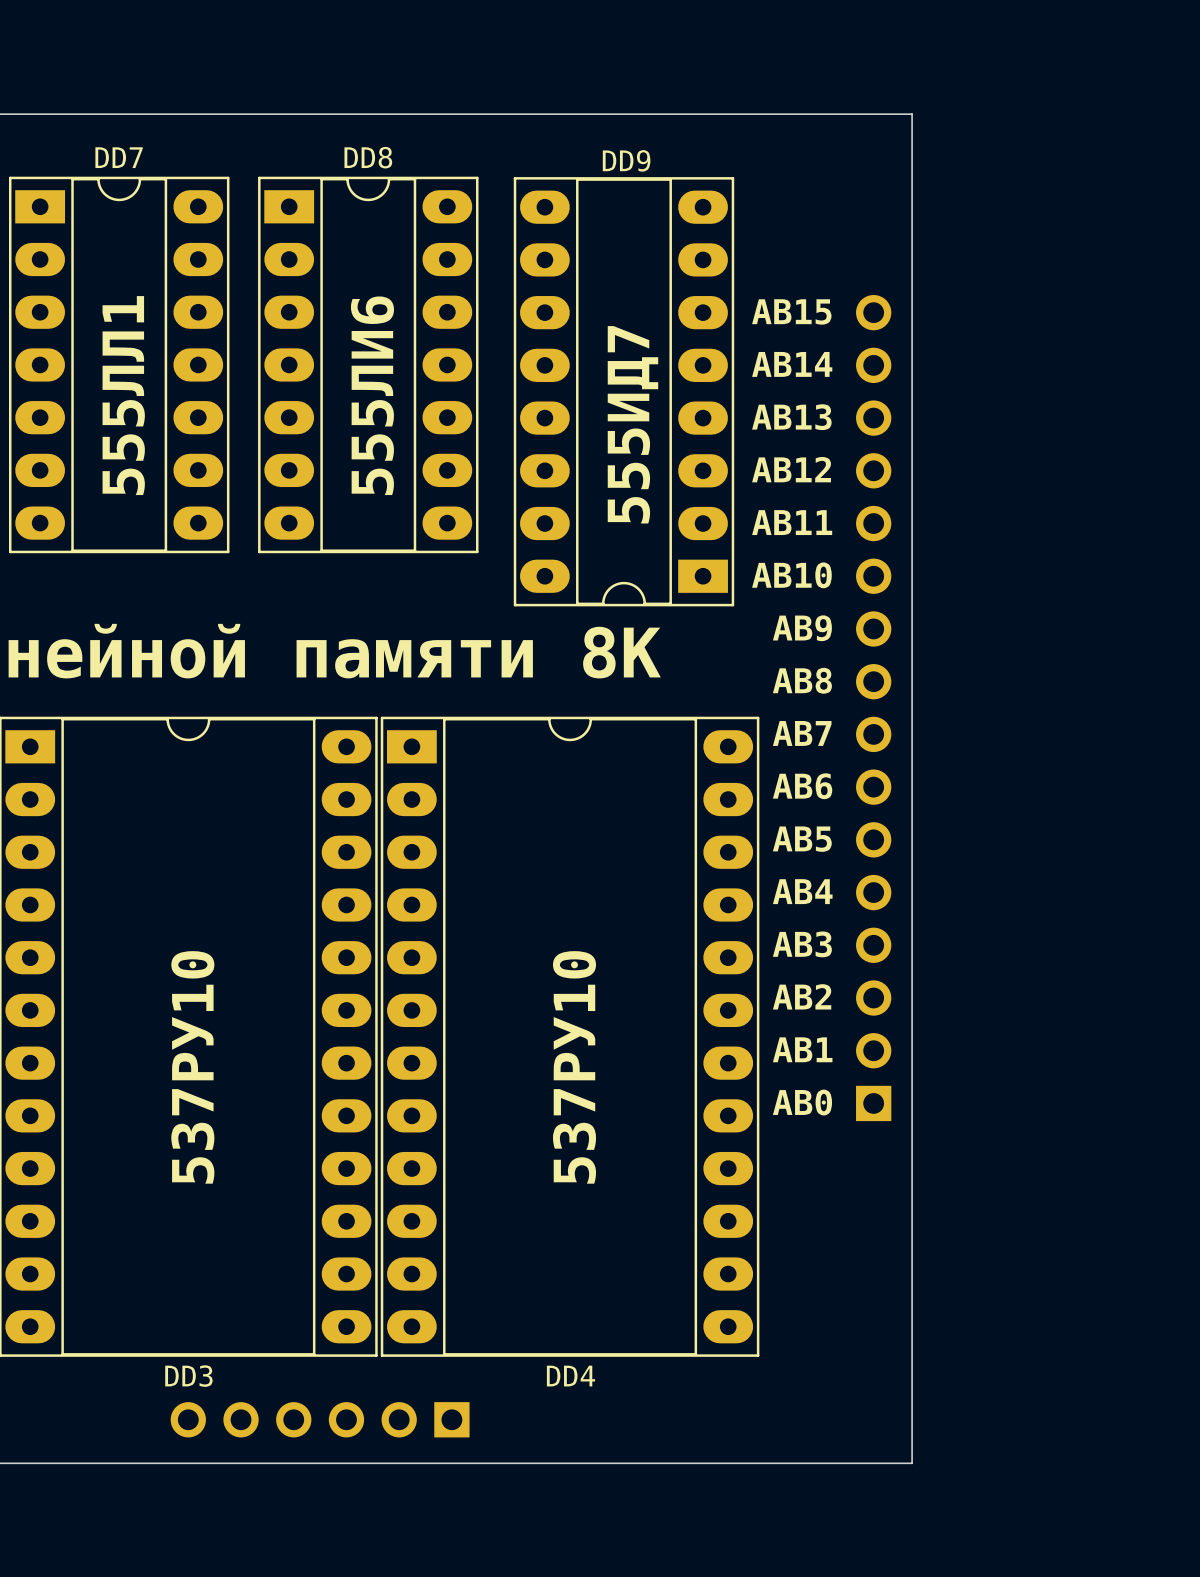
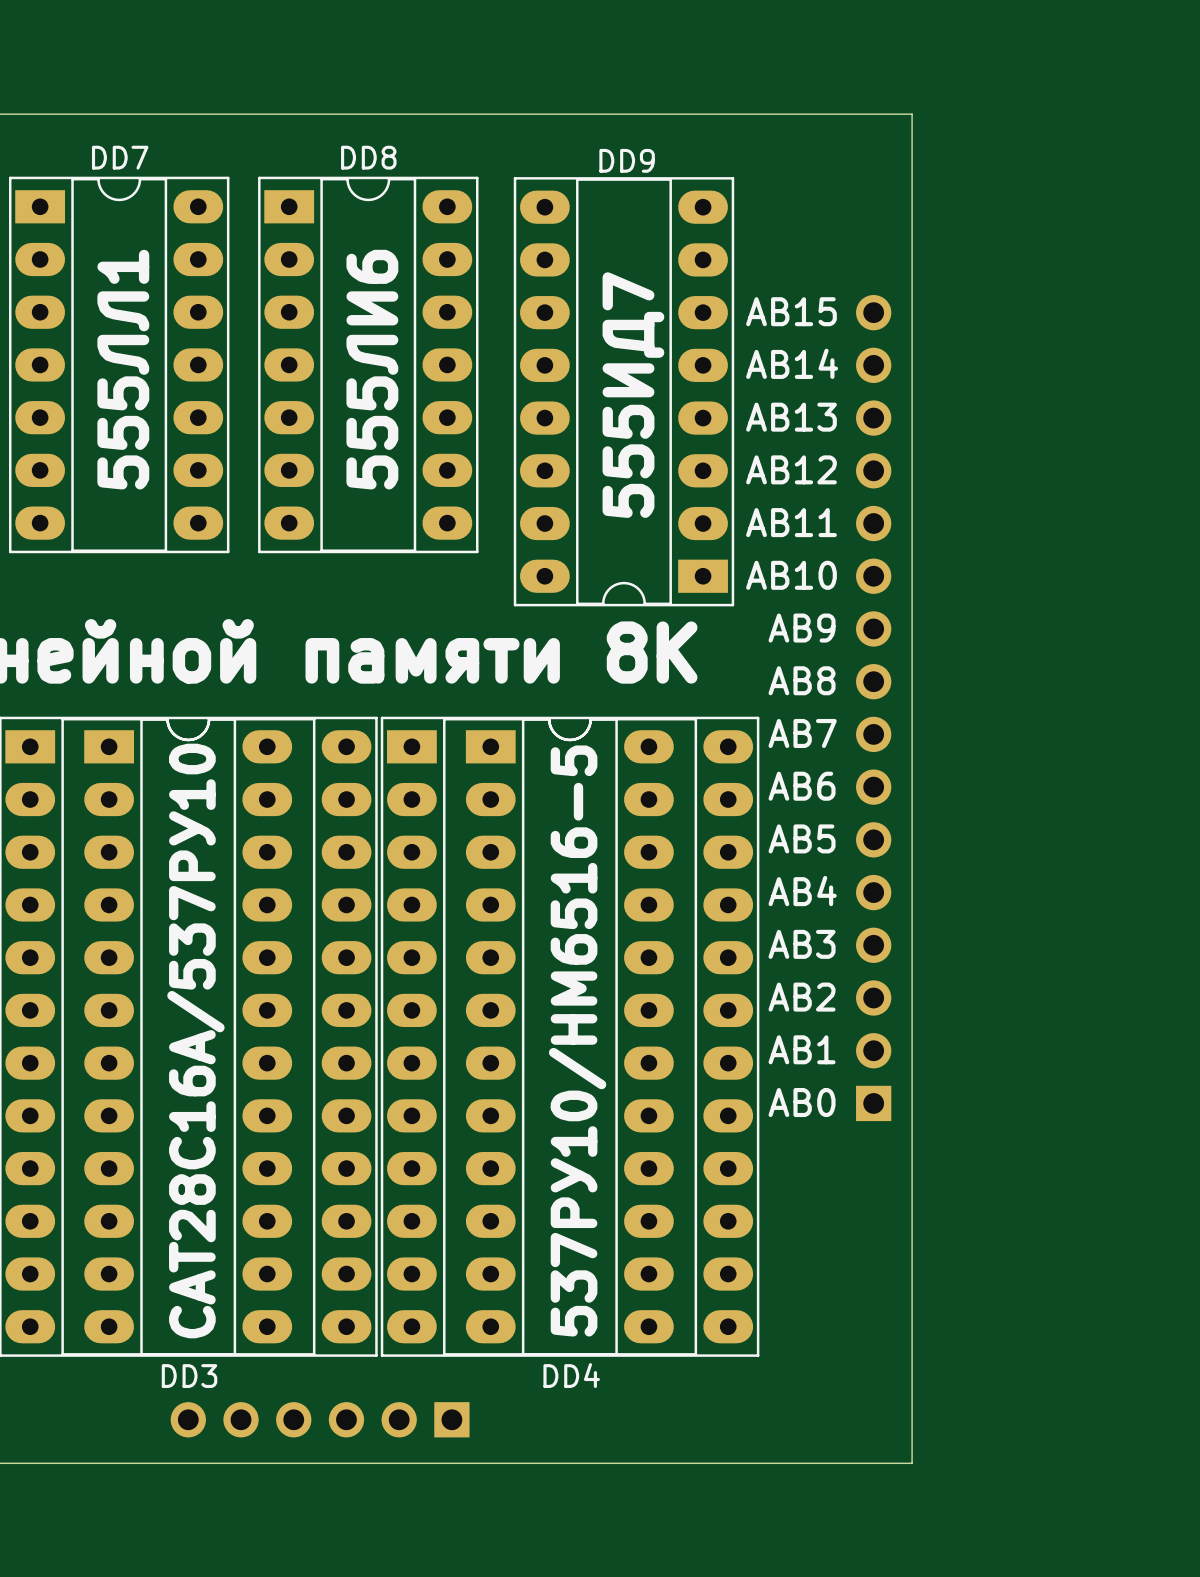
part: none -> (188, 1036)
part: none -> (569, 1036)
text: 537РУ10 (192, 1067) -> none
text: 537РУ10 (574, 1067) -> 537РУ10/HM6516-5 (577, 1041)
text: none -> CAT28C16A/537РУ10 (195, 1041)

